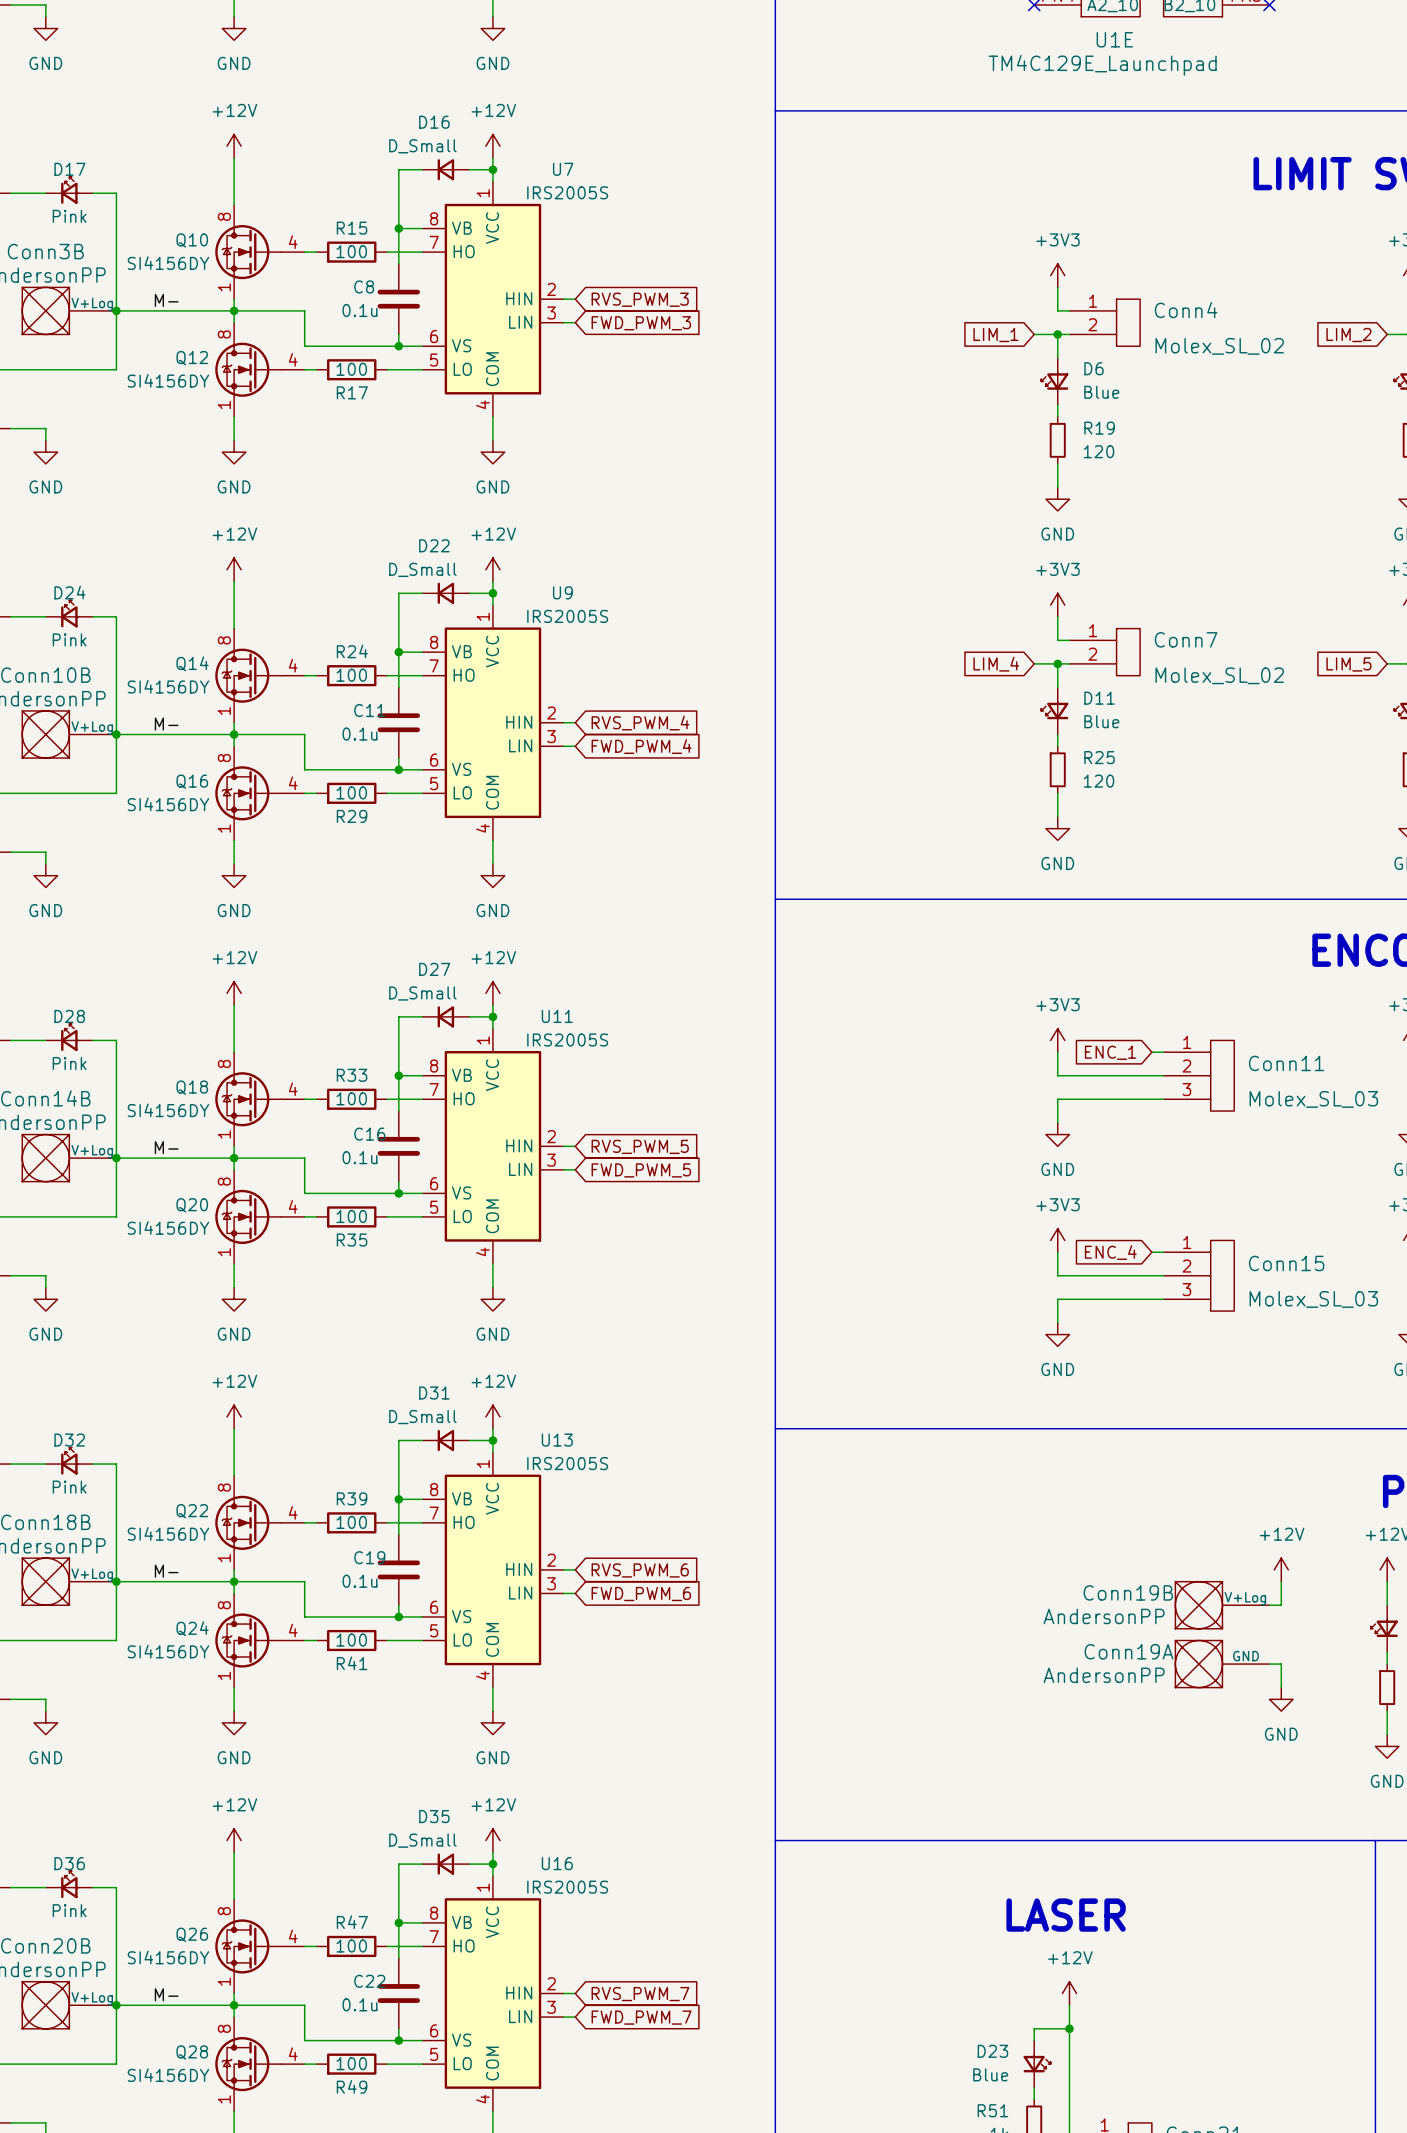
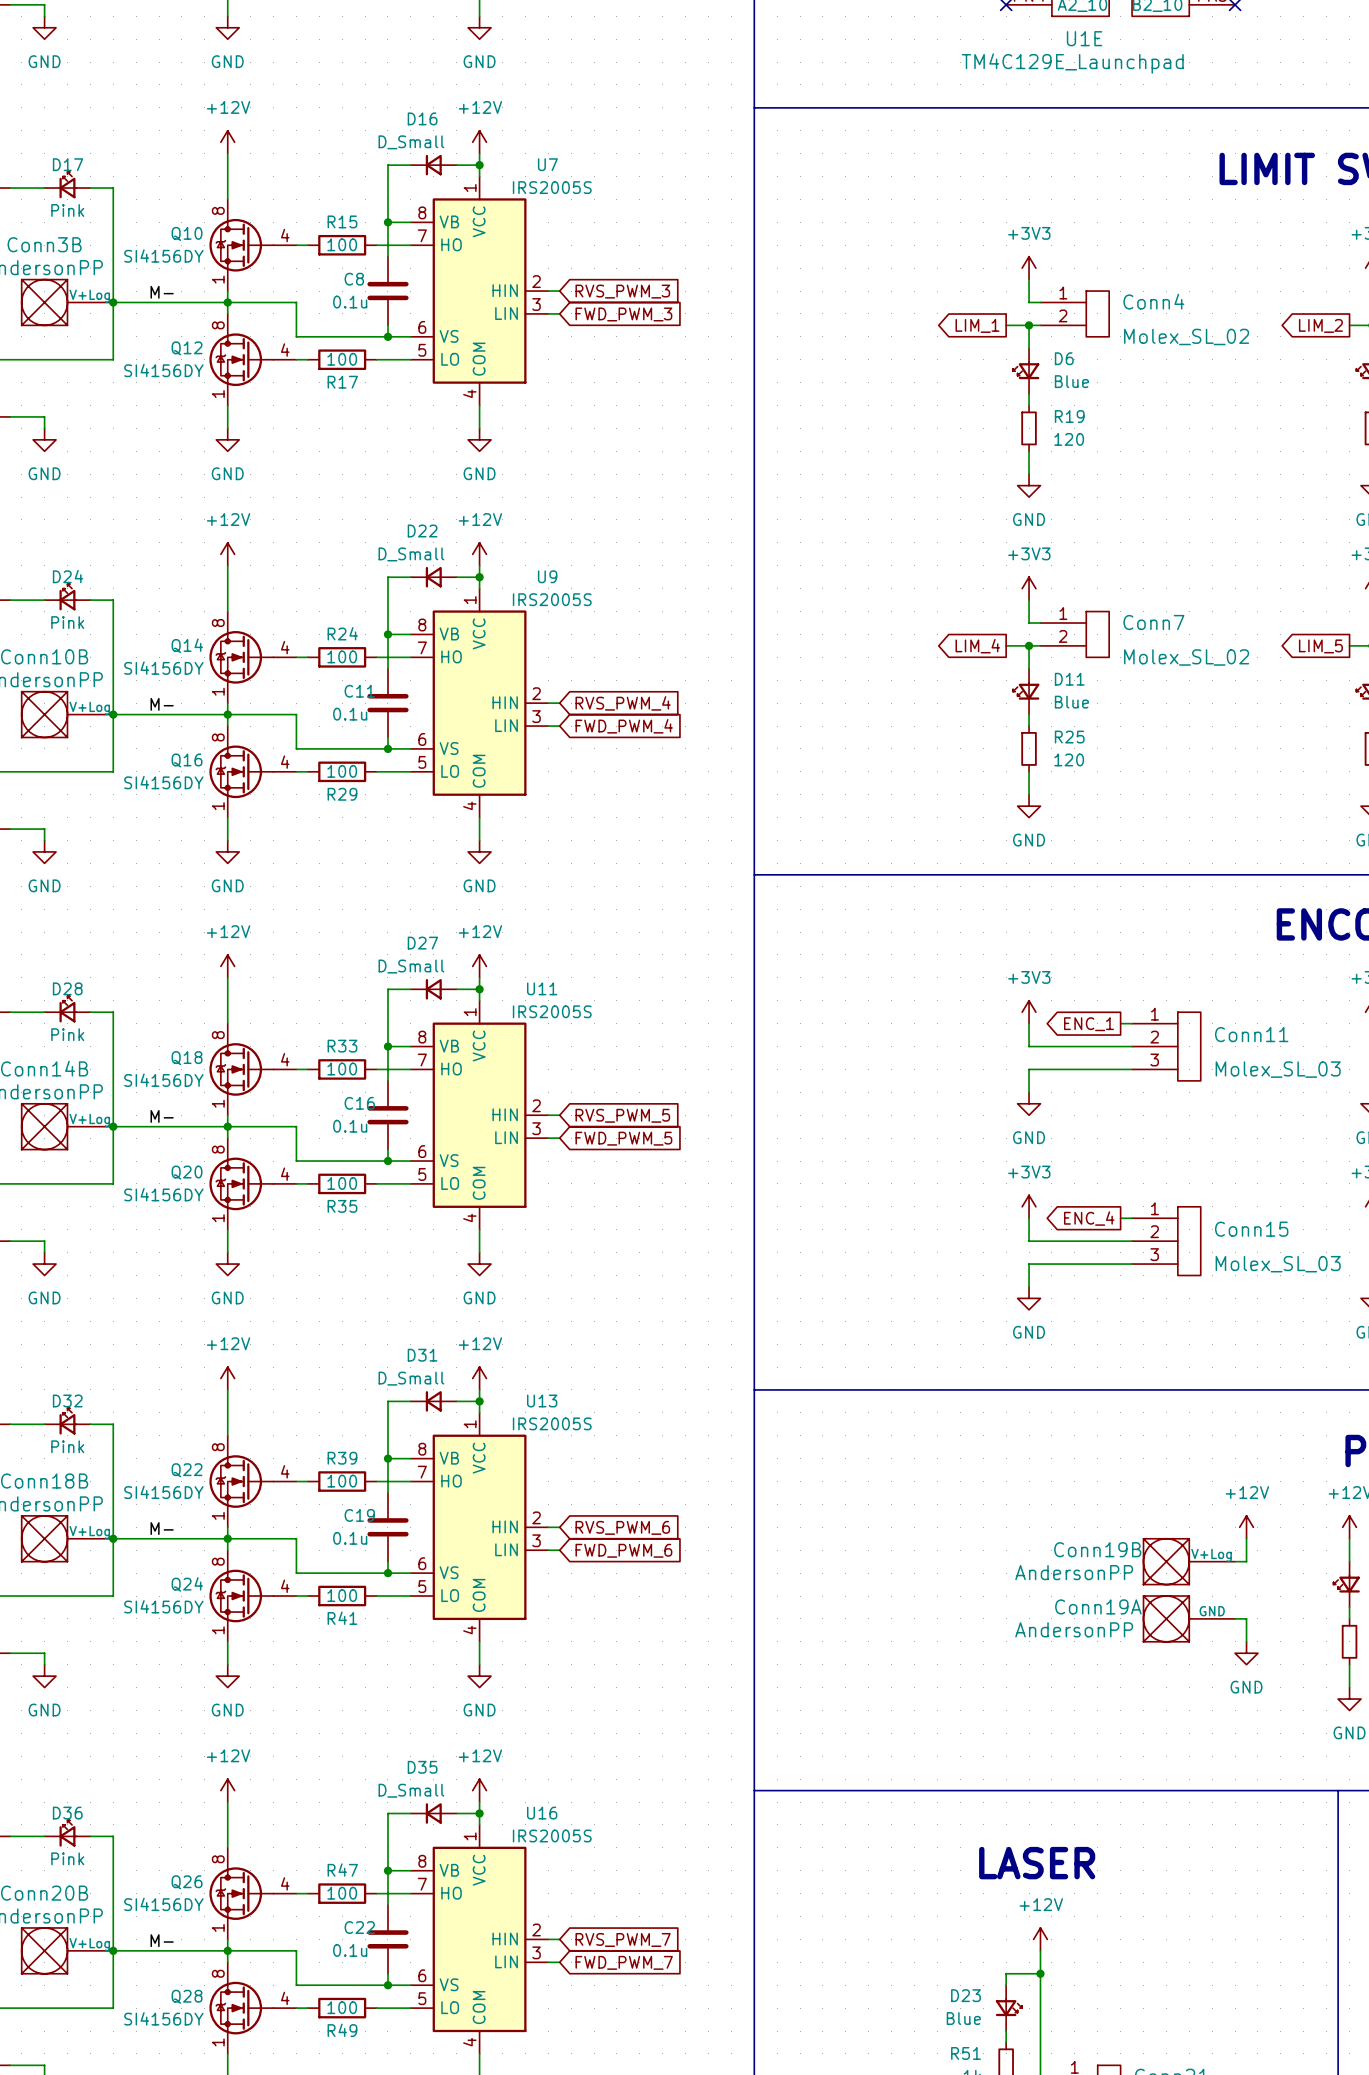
global label shape: input (995, 335) -> output (977, 325)
global label shape: input (1348, 335) -> output (1320, 325)
global label shape: input (996, 664) -> output (977, 646)
global label shape: input (1348, 664) -> output (1320, 646)
global label shape: input (1110, 1052) -> output (1088, 1024)
global label shape: input (1110, 1252) -> output (1089, 1218)

